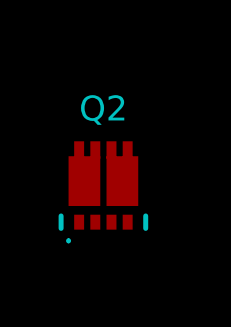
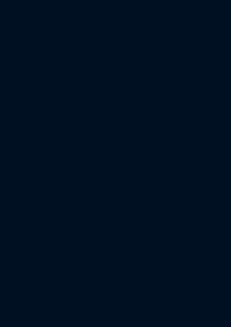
Q2: (103, 192) -> none

